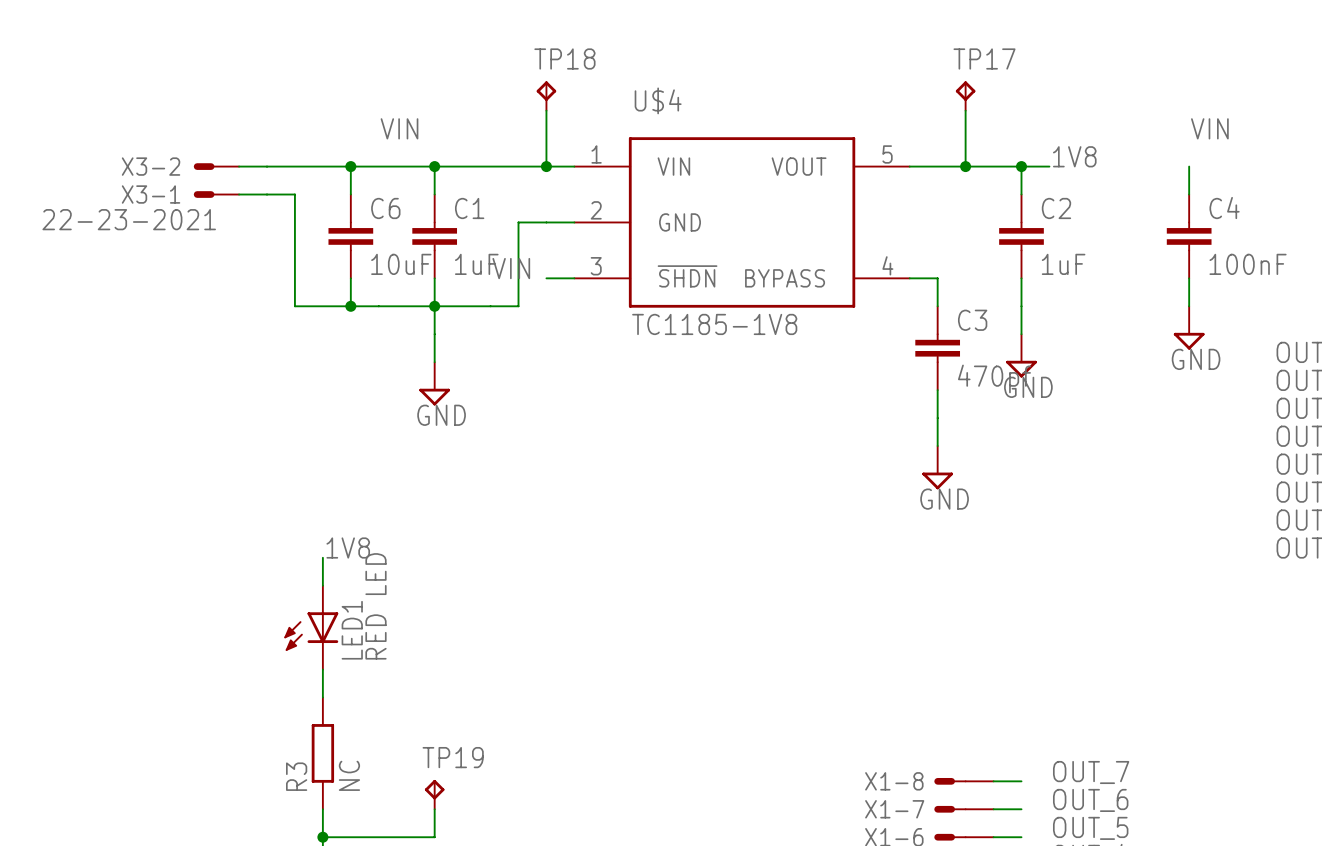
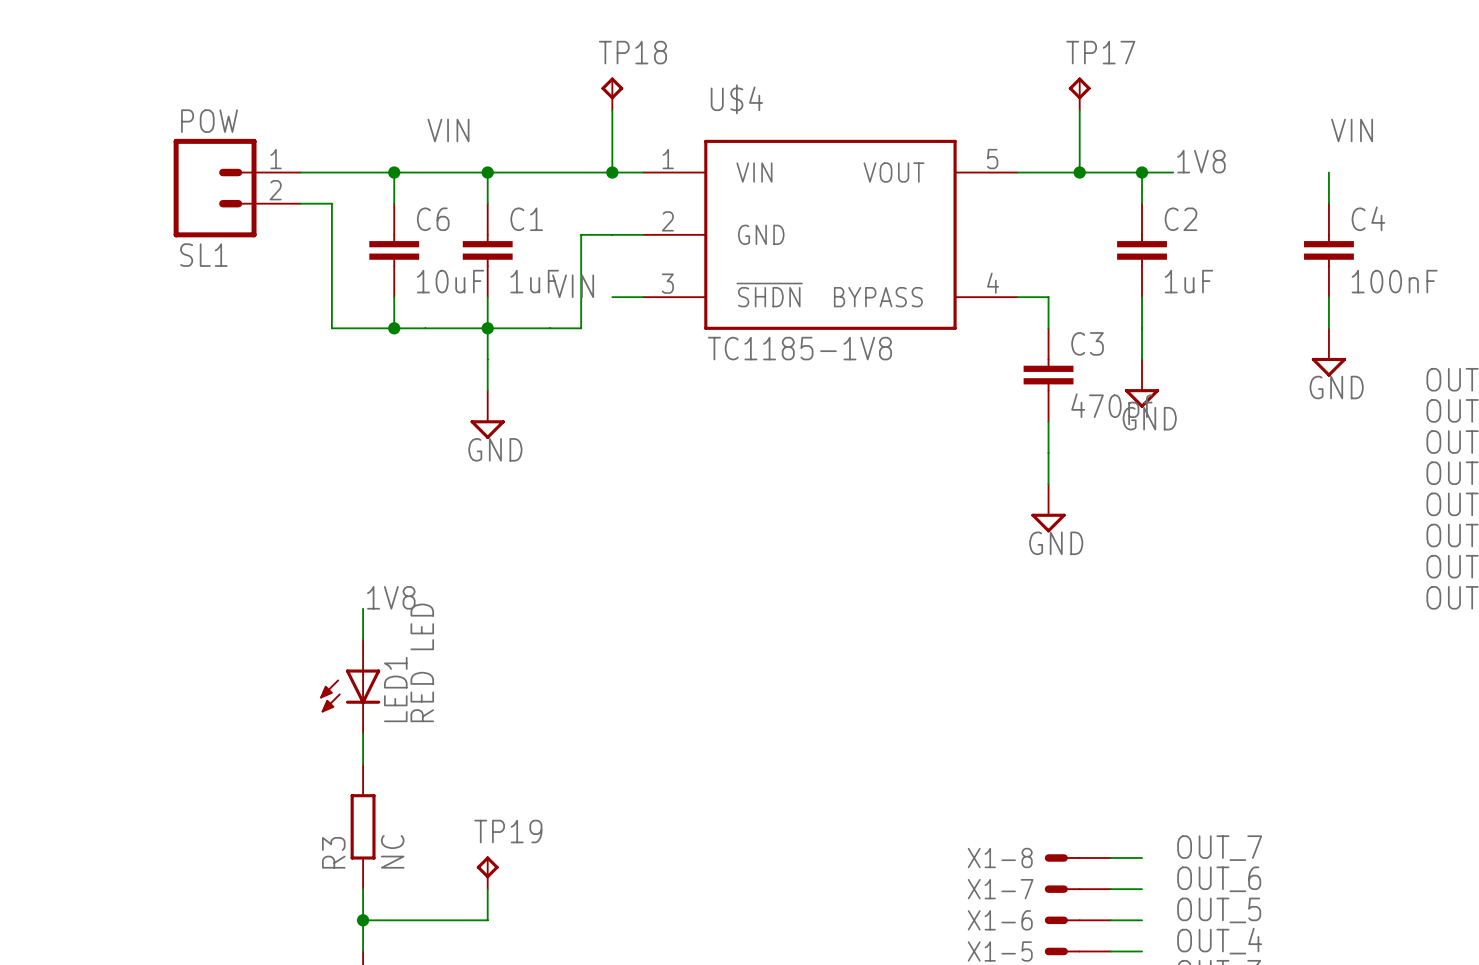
X3-2: (216, 166) -> none
SL1: none -> POW (237, 188)
X3-1: 22-23-2021 (216, 194) -> none

